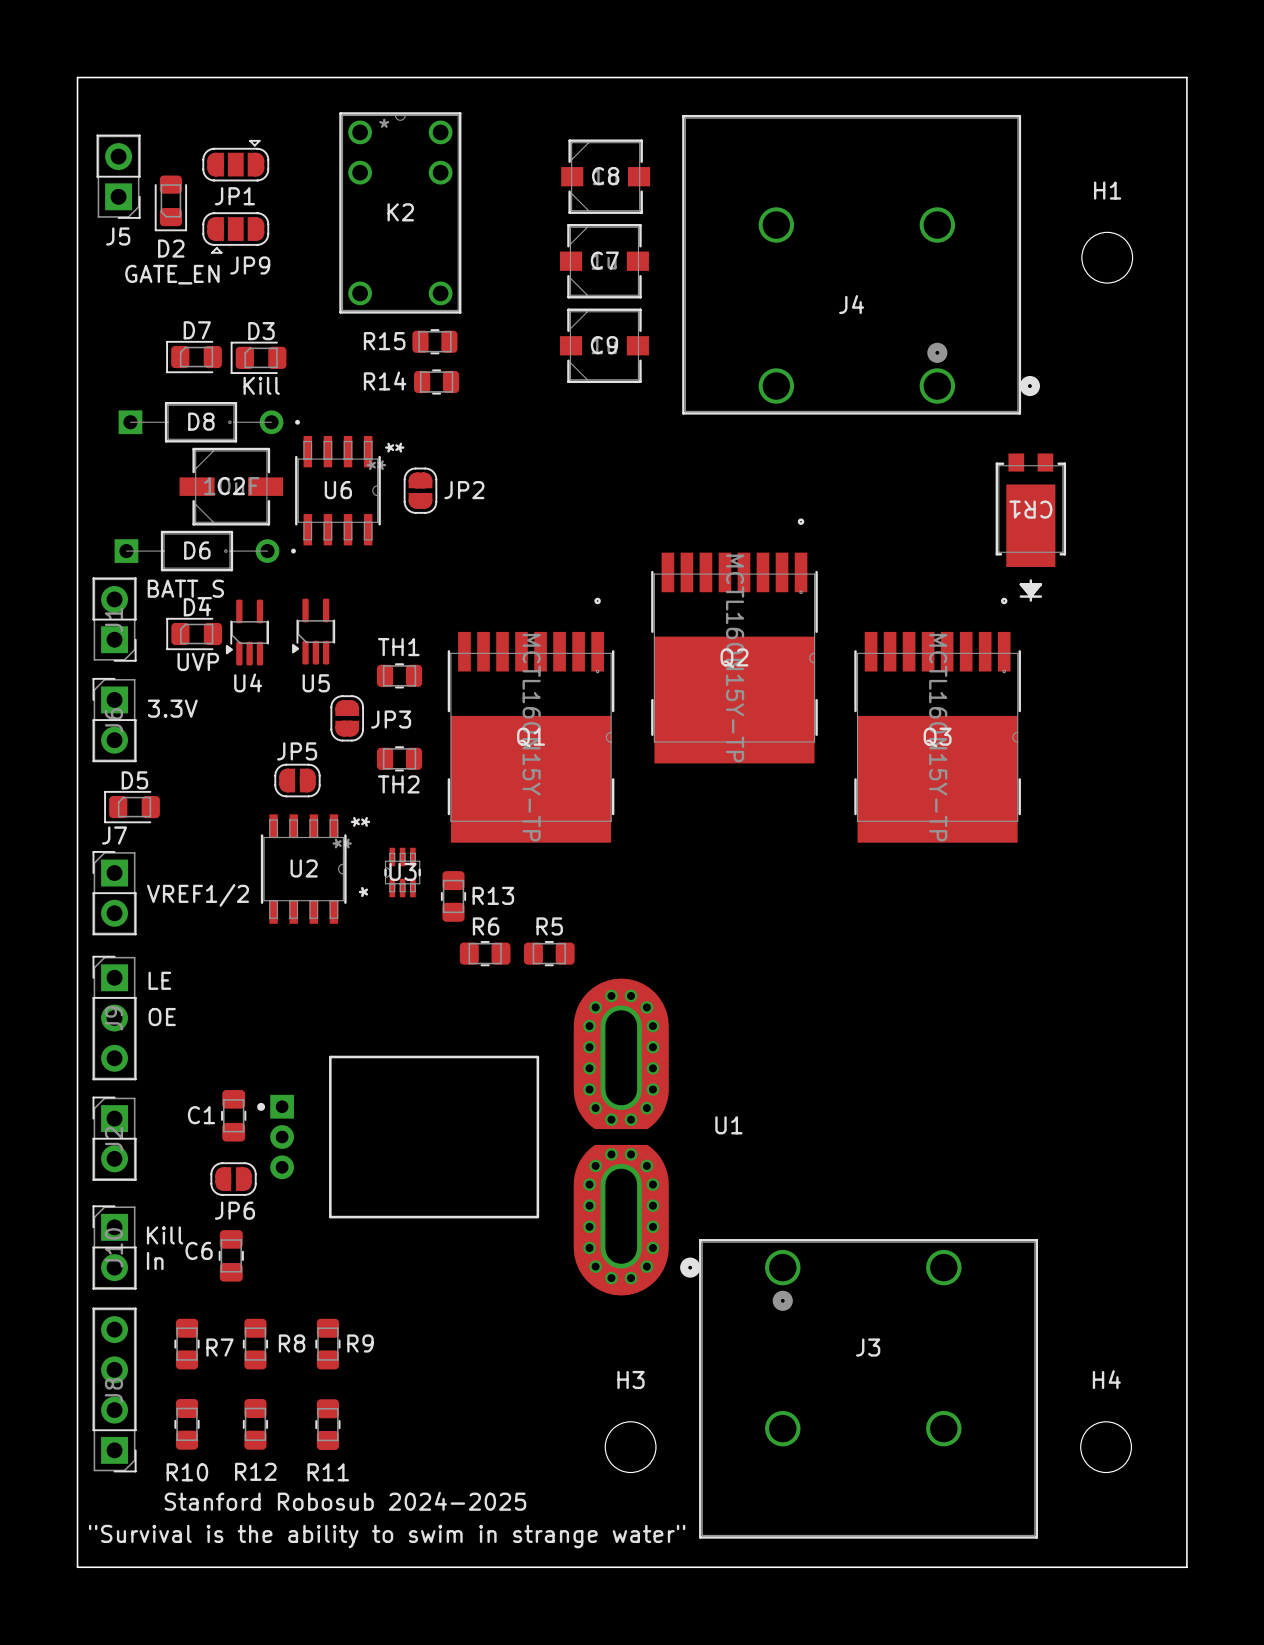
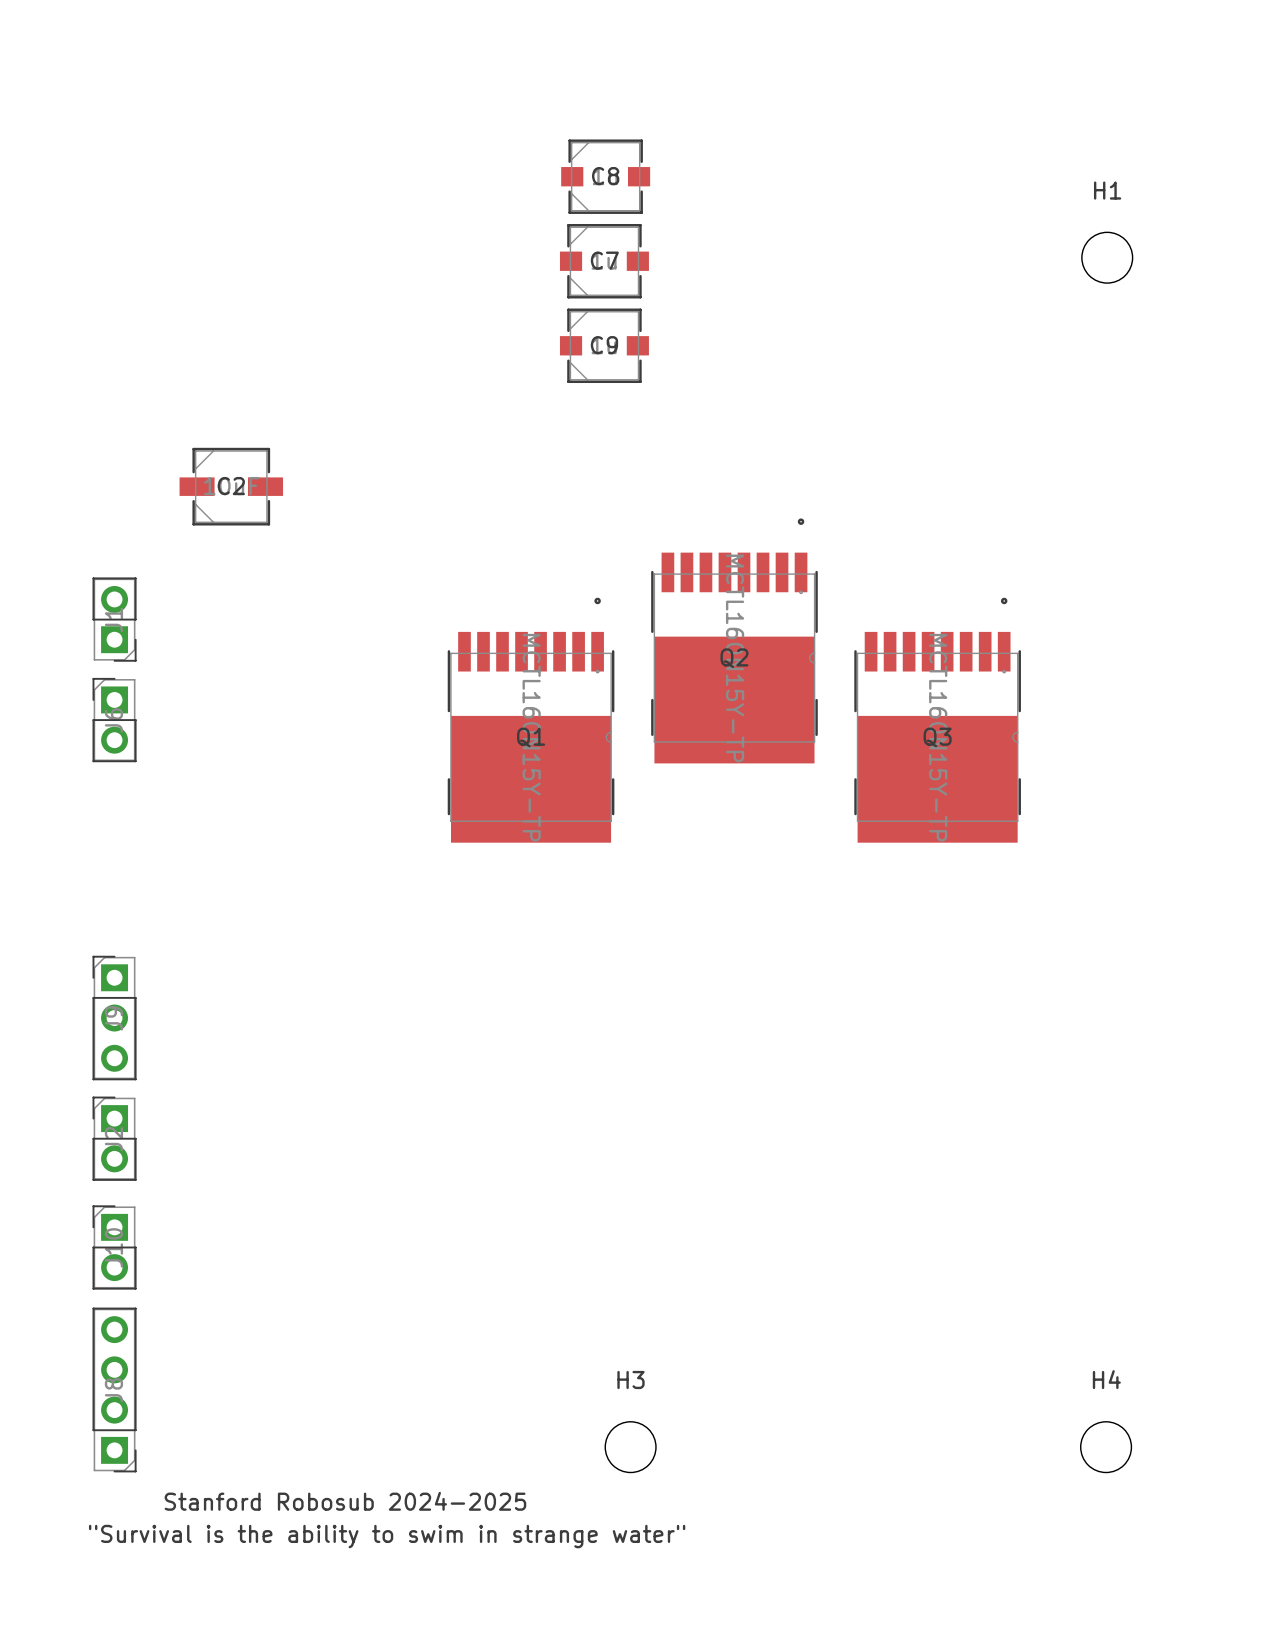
board edge: (77, 77) (1186, 77) (1186, 1567) (77, 1567) (77, 77) -> none
JP1: (235, 160) -> none
J5: (118, 176) -> none
D2: (170, 203) -> none
K2: (400, 212) -> none
JP9: (235, 232) -> none
J4: (861, 264) -> none
text: GATE_EN (172, 274) -> none
R15: (434, 341) -> none
D7: (193, 357) -> none
D3: (258, 357) -> none
R14: (436, 382) -> none
text: Kill (261, 385) -> none
D8: (209, 422) -> none
U6: (337, 490) -> none
JP2: (420, 490) -> none
CR1: (1030, 527) -> none
D6: (205, 551) -> none
text: BATT_S (185, 589) -> none
U5: (313, 631) -> none
U4: (247, 632) -> none
D4: (194, 634) -> none
text: UVP (198, 661) -> none
TH1: (399, 675) -> none
text: 3.3V (172, 708) -> none
JP3: (347, 718) -> none
TH2: (399, 758) -> none
JP5: (297, 780) -> none
D5: (132, 807) -> none
U2: (303, 869) -> none
U3: (402, 872) -> none
J7: (114, 893) -> none
text: VREF1/2 (198, 895) -> none
R13: (453, 896) -> none
R6: (485, 953) -> none
R5: (549, 953) -> none
text: LE (159, 980) -> none
text: OE (162, 1017) -> none
C1: (233, 1115) -> none
U1: (462, 1137) -> none
JP6: (233, 1179) -> none
text: Kill (165, 1235) -> none
C6: (231, 1255) -> none
text: In (155, 1260) -> none
R7: (187, 1344) -> none
R8: (255, 1344) -> none
R9: (327, 1344) -> none
J3: (859, 1388) -> none
R10: (187, 1424) -> none
R12: (255, 1424) -> none
R11: (327, 1424) -> none

